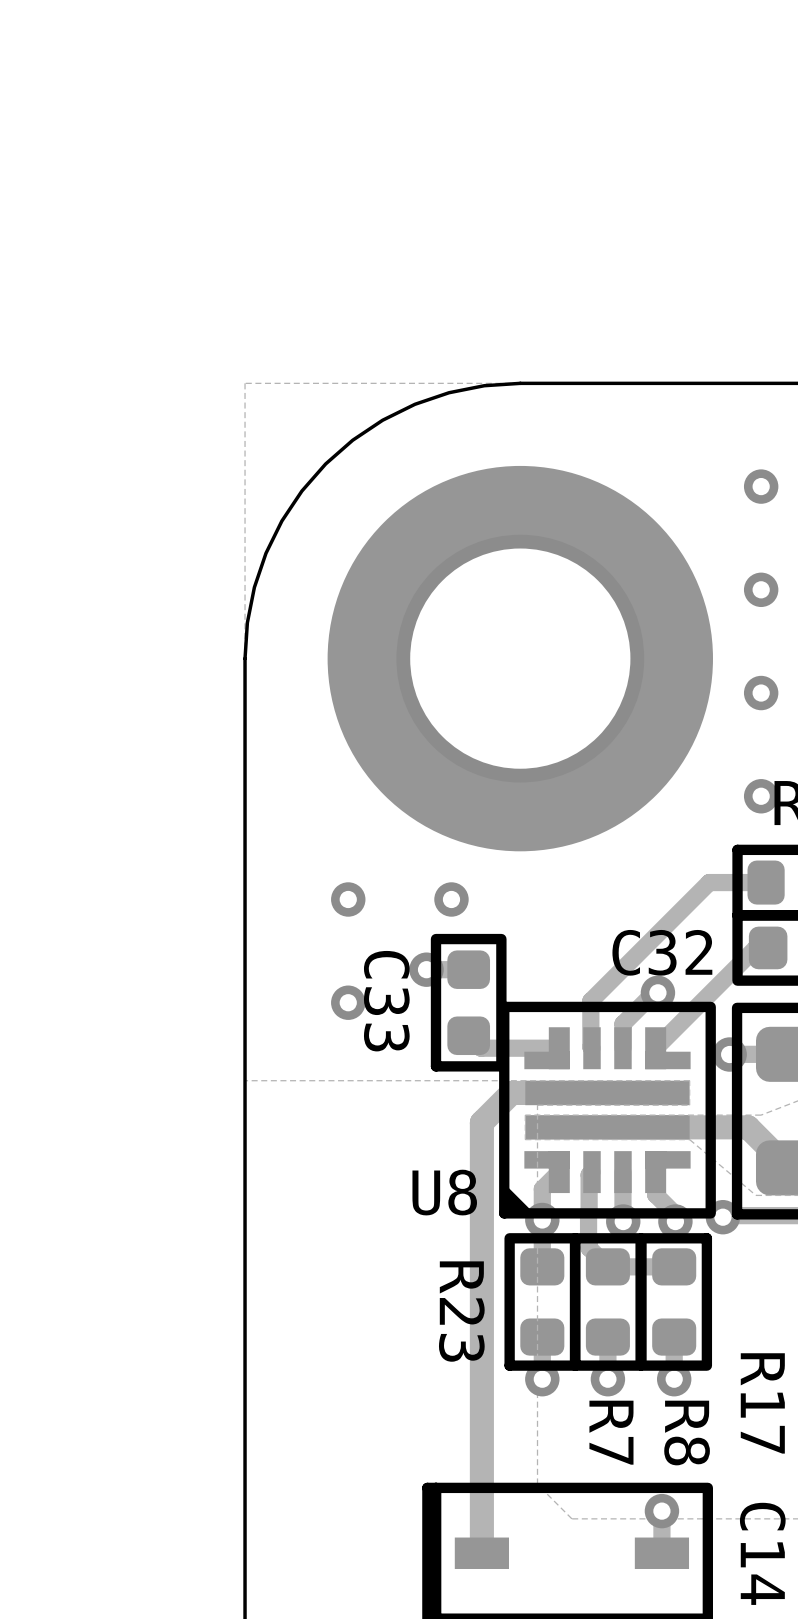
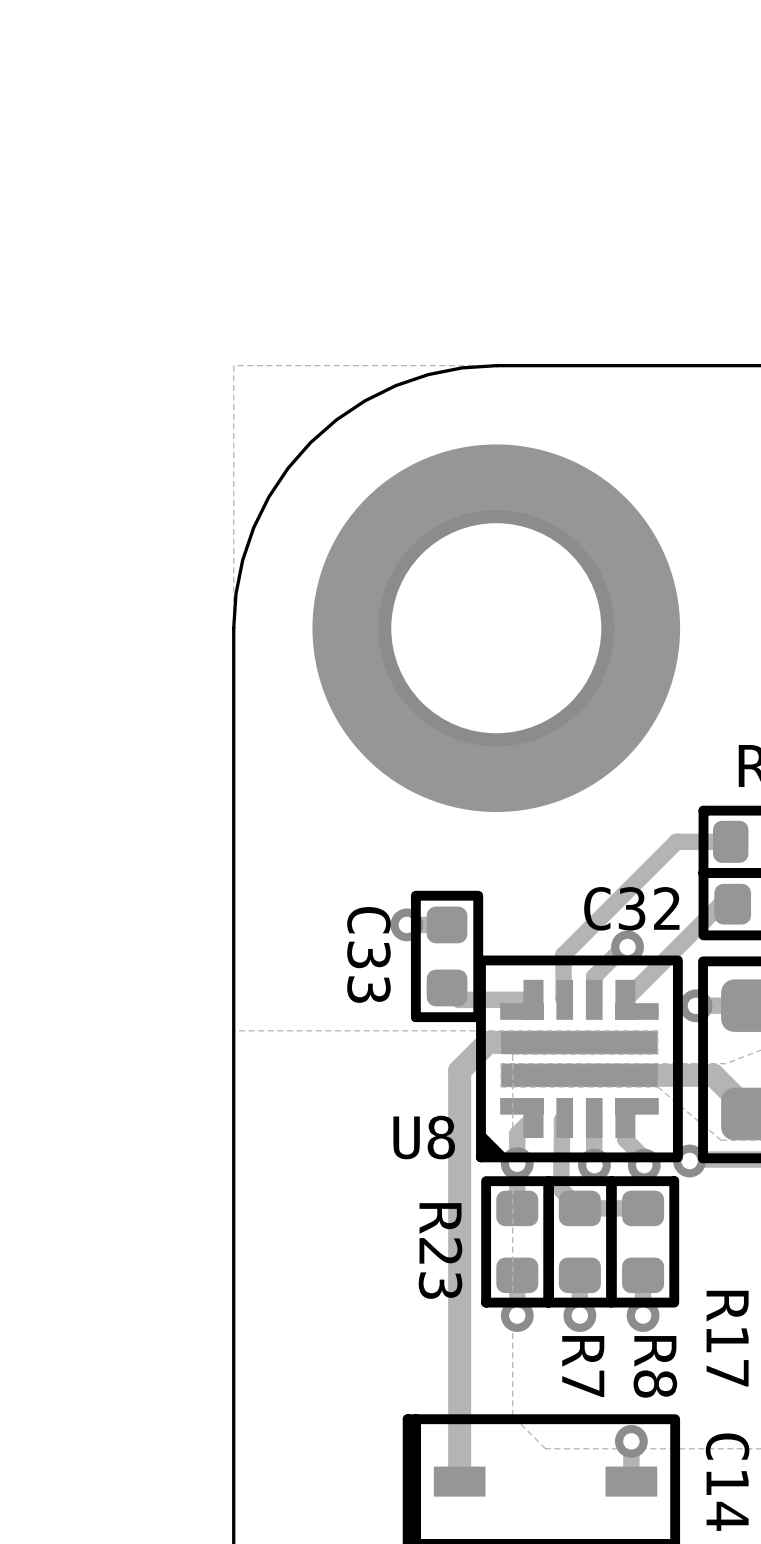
via: (761, 486) -> none
via: (761, 589) -> none
via: (761, 693) -> none
via: (761, 796) -> none
via: (348, 899) -> none
via: (451, 899) -> none
via: (348, 1002) -> none

